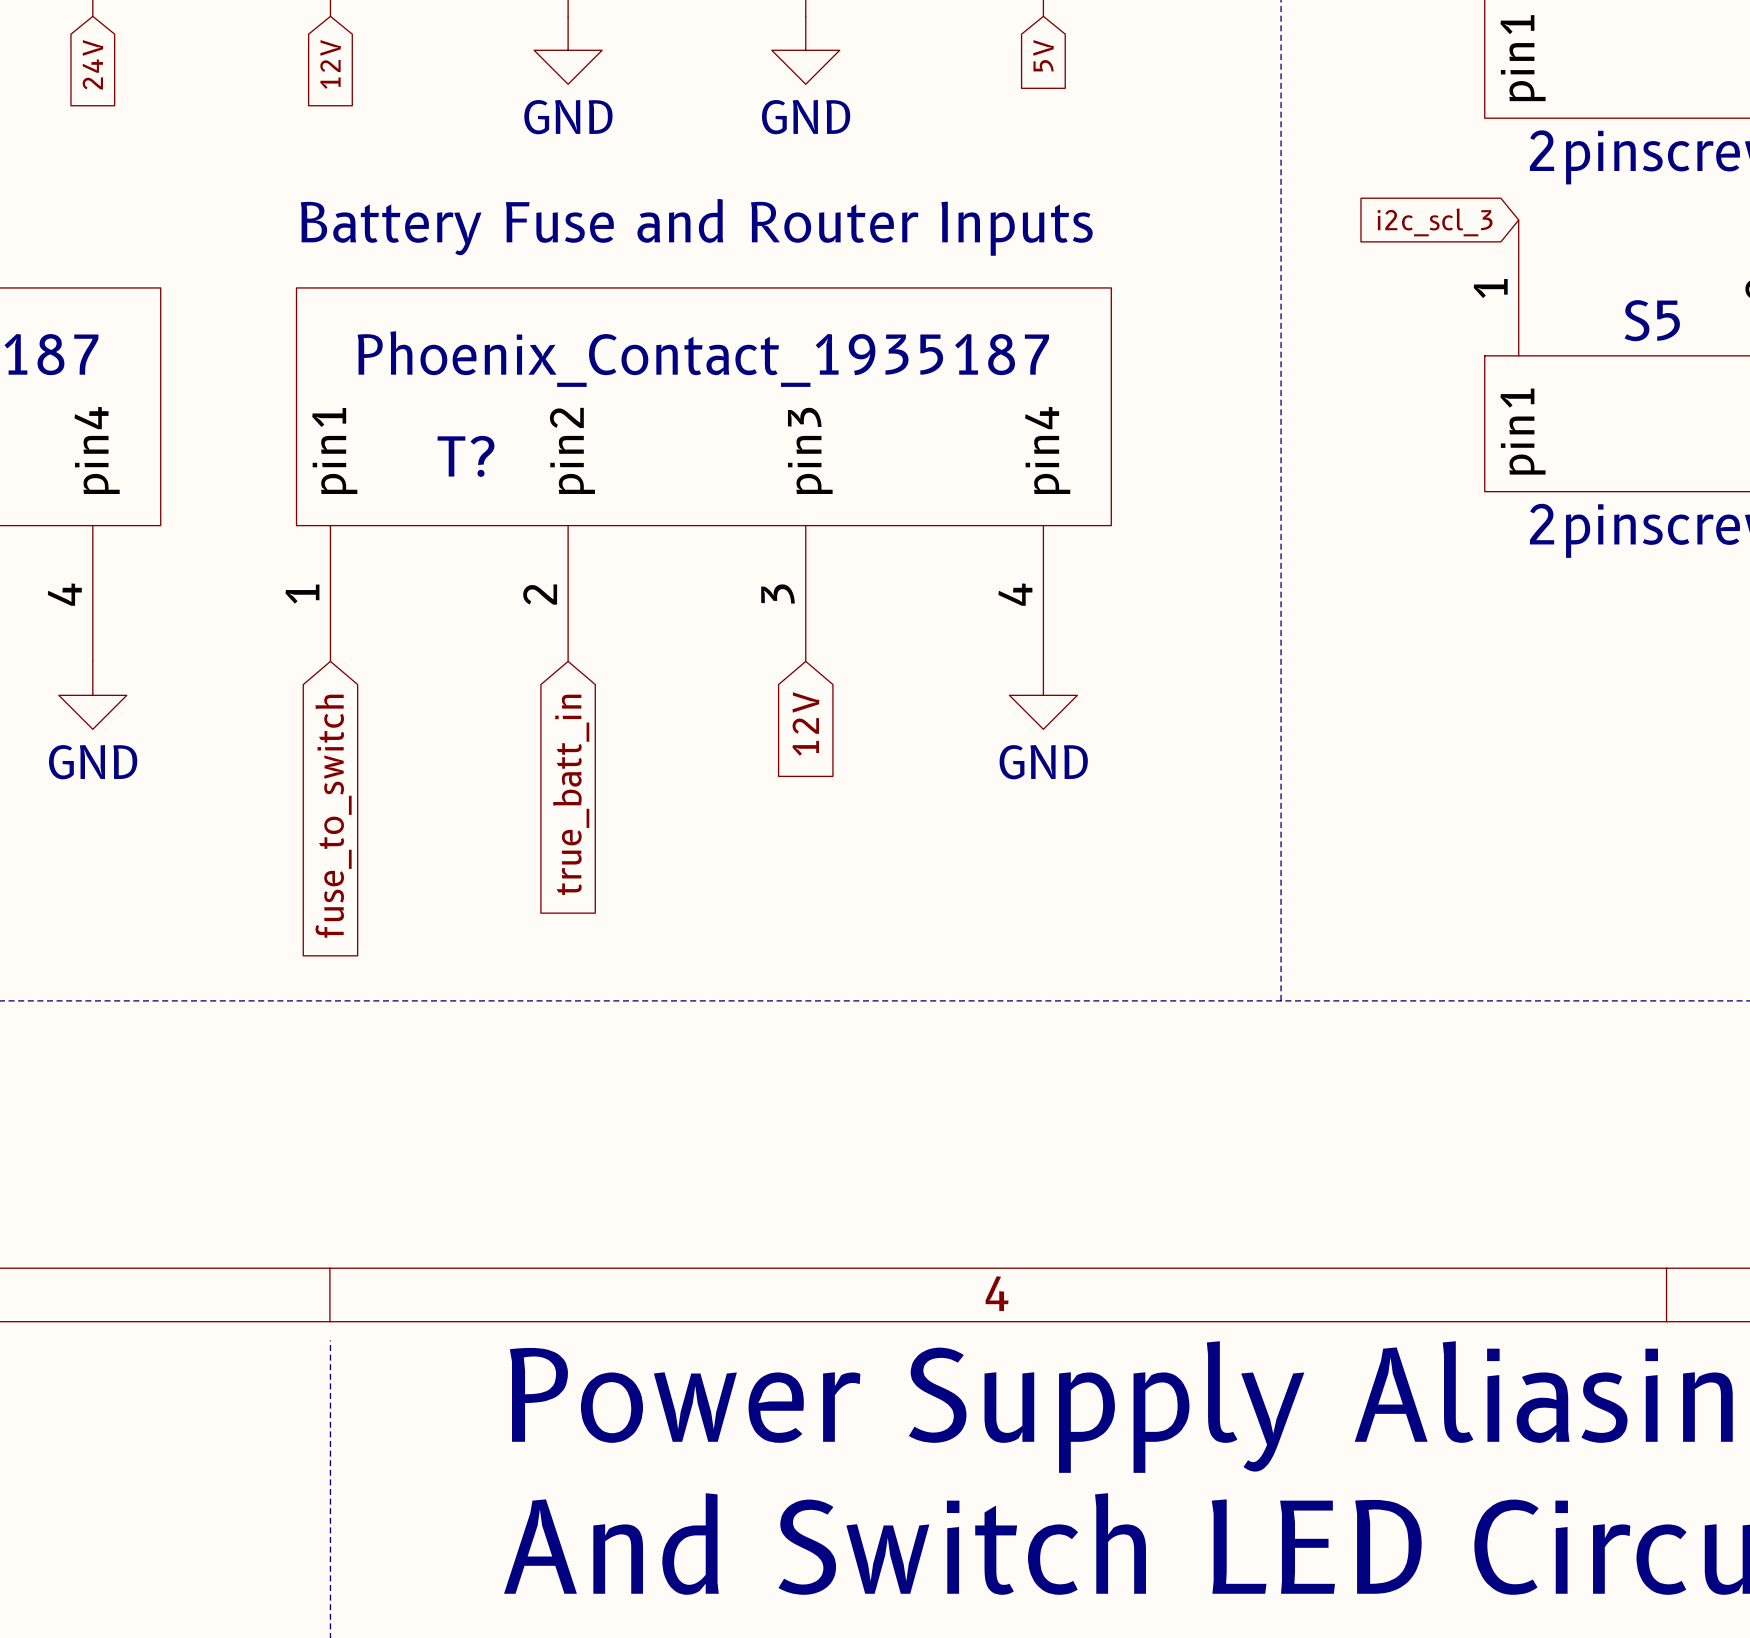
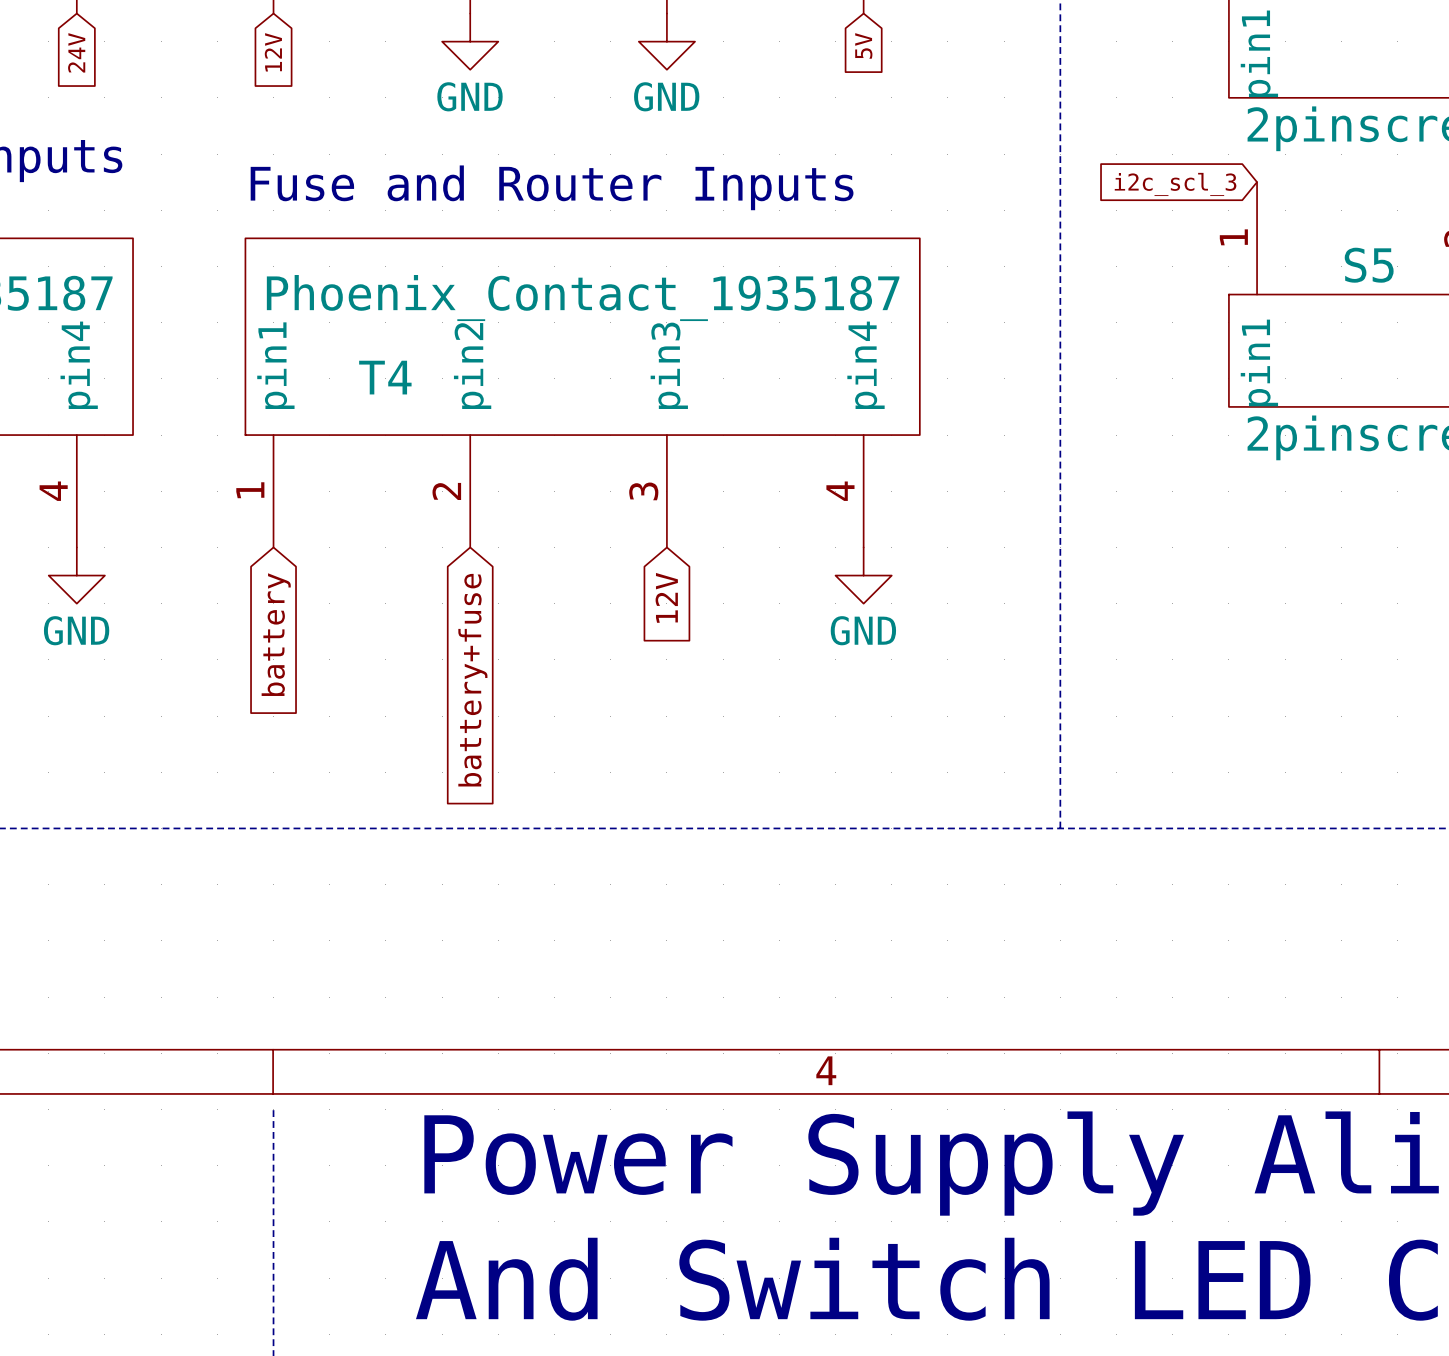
text: Battery Fuse and Router Inputs (696, 227) -> Fuse and Router Inputs (552, 187)
T? name: T? (465, 456) -> T4 (385, 377)
global label: true_batt_in (571, 794) -> battery+fuse (472, 680)
global label: fuse_to_switch (333, 816) -> battery (276, 634)

